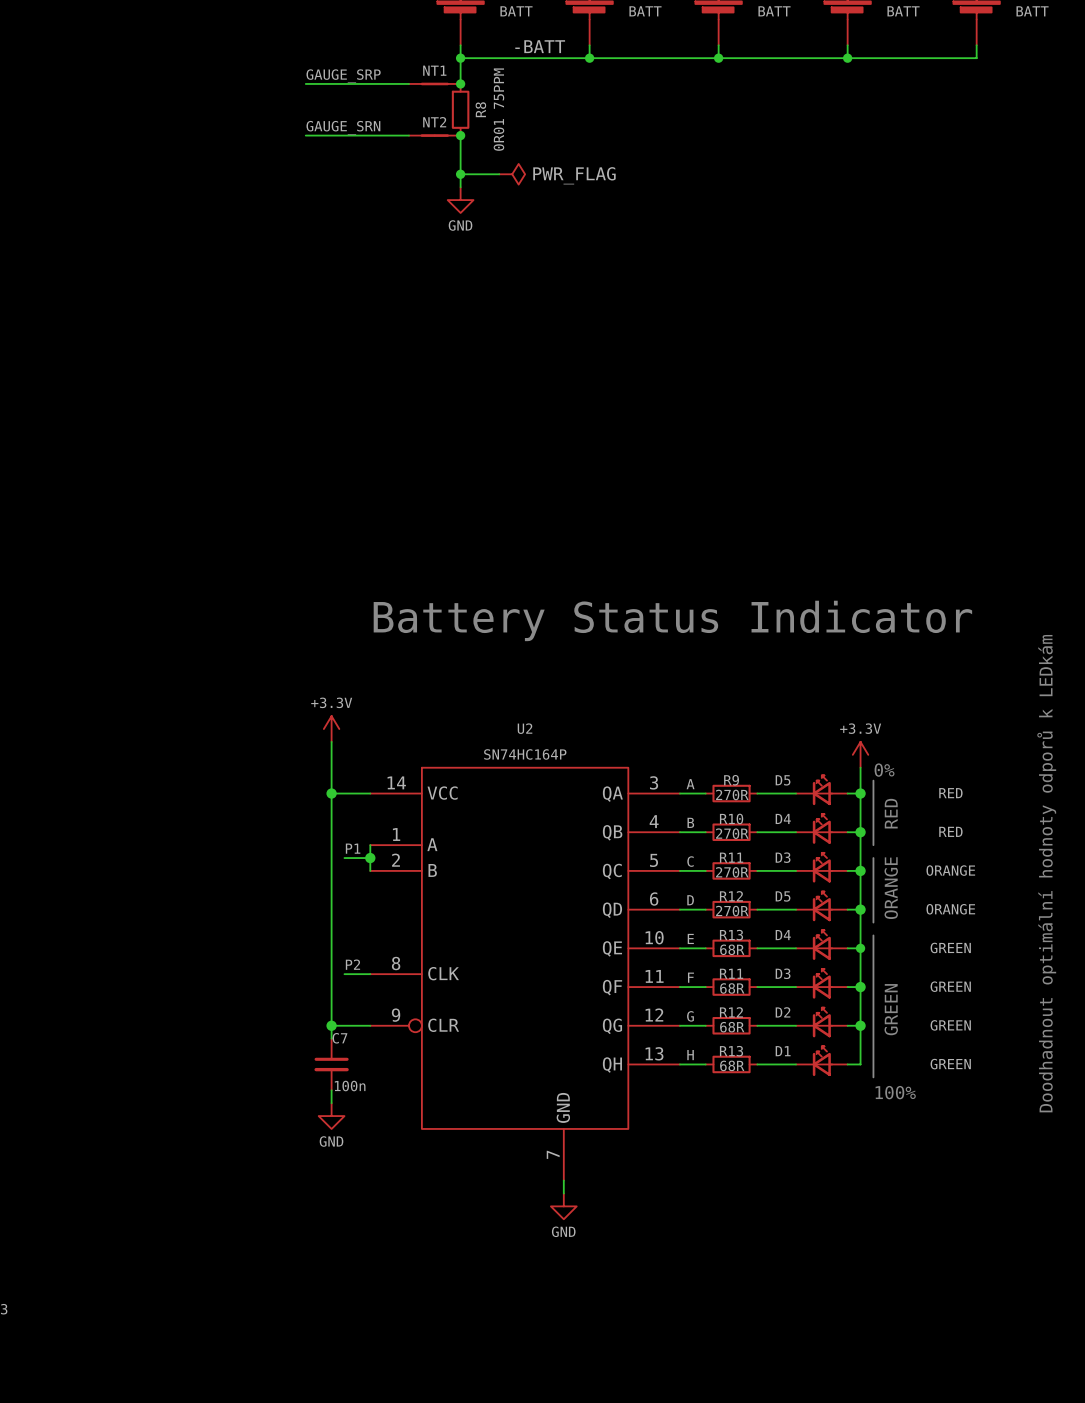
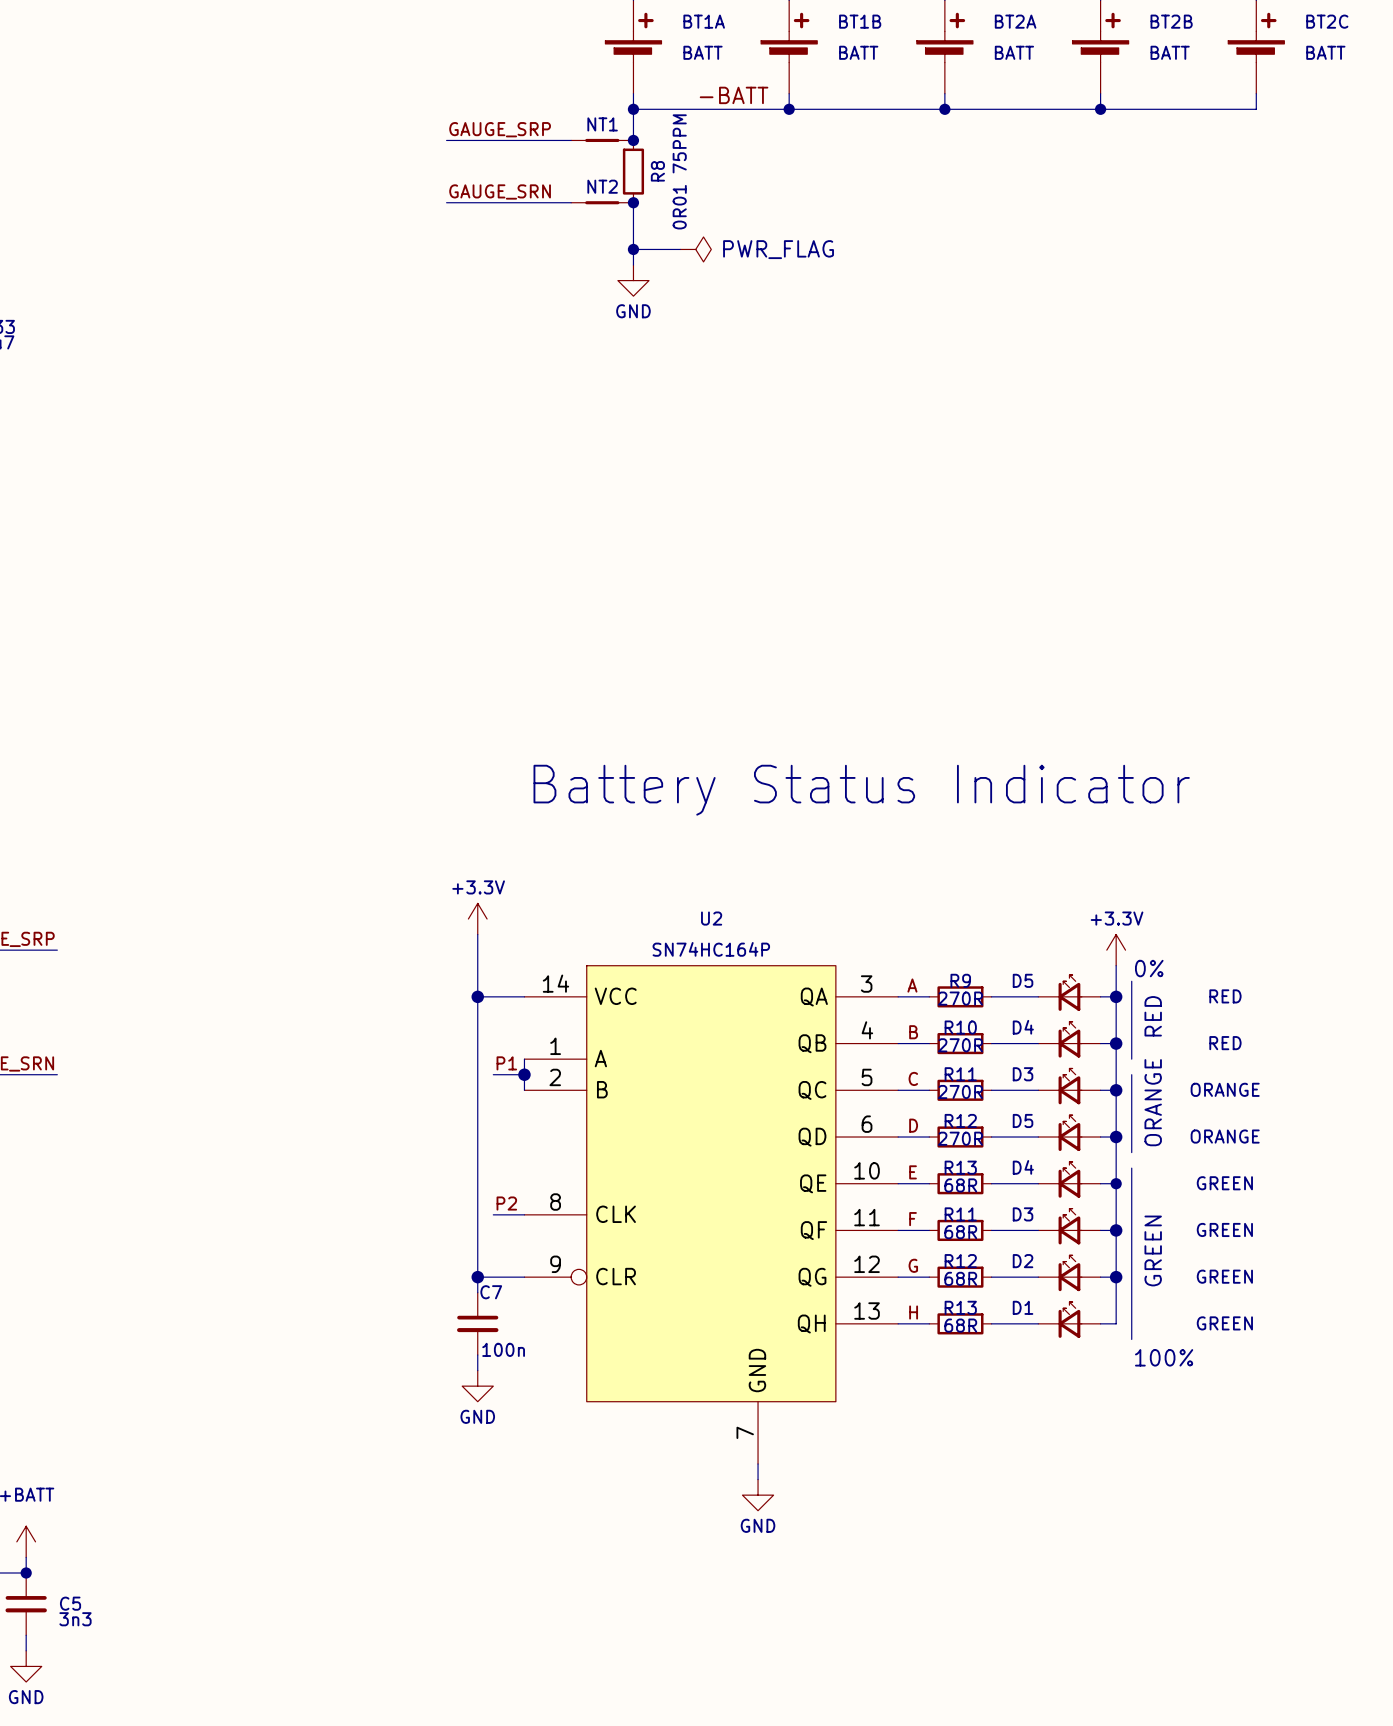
text: Doodhadnout optimální hodnoty odporů k LEDkám (1046, 873) -> none

